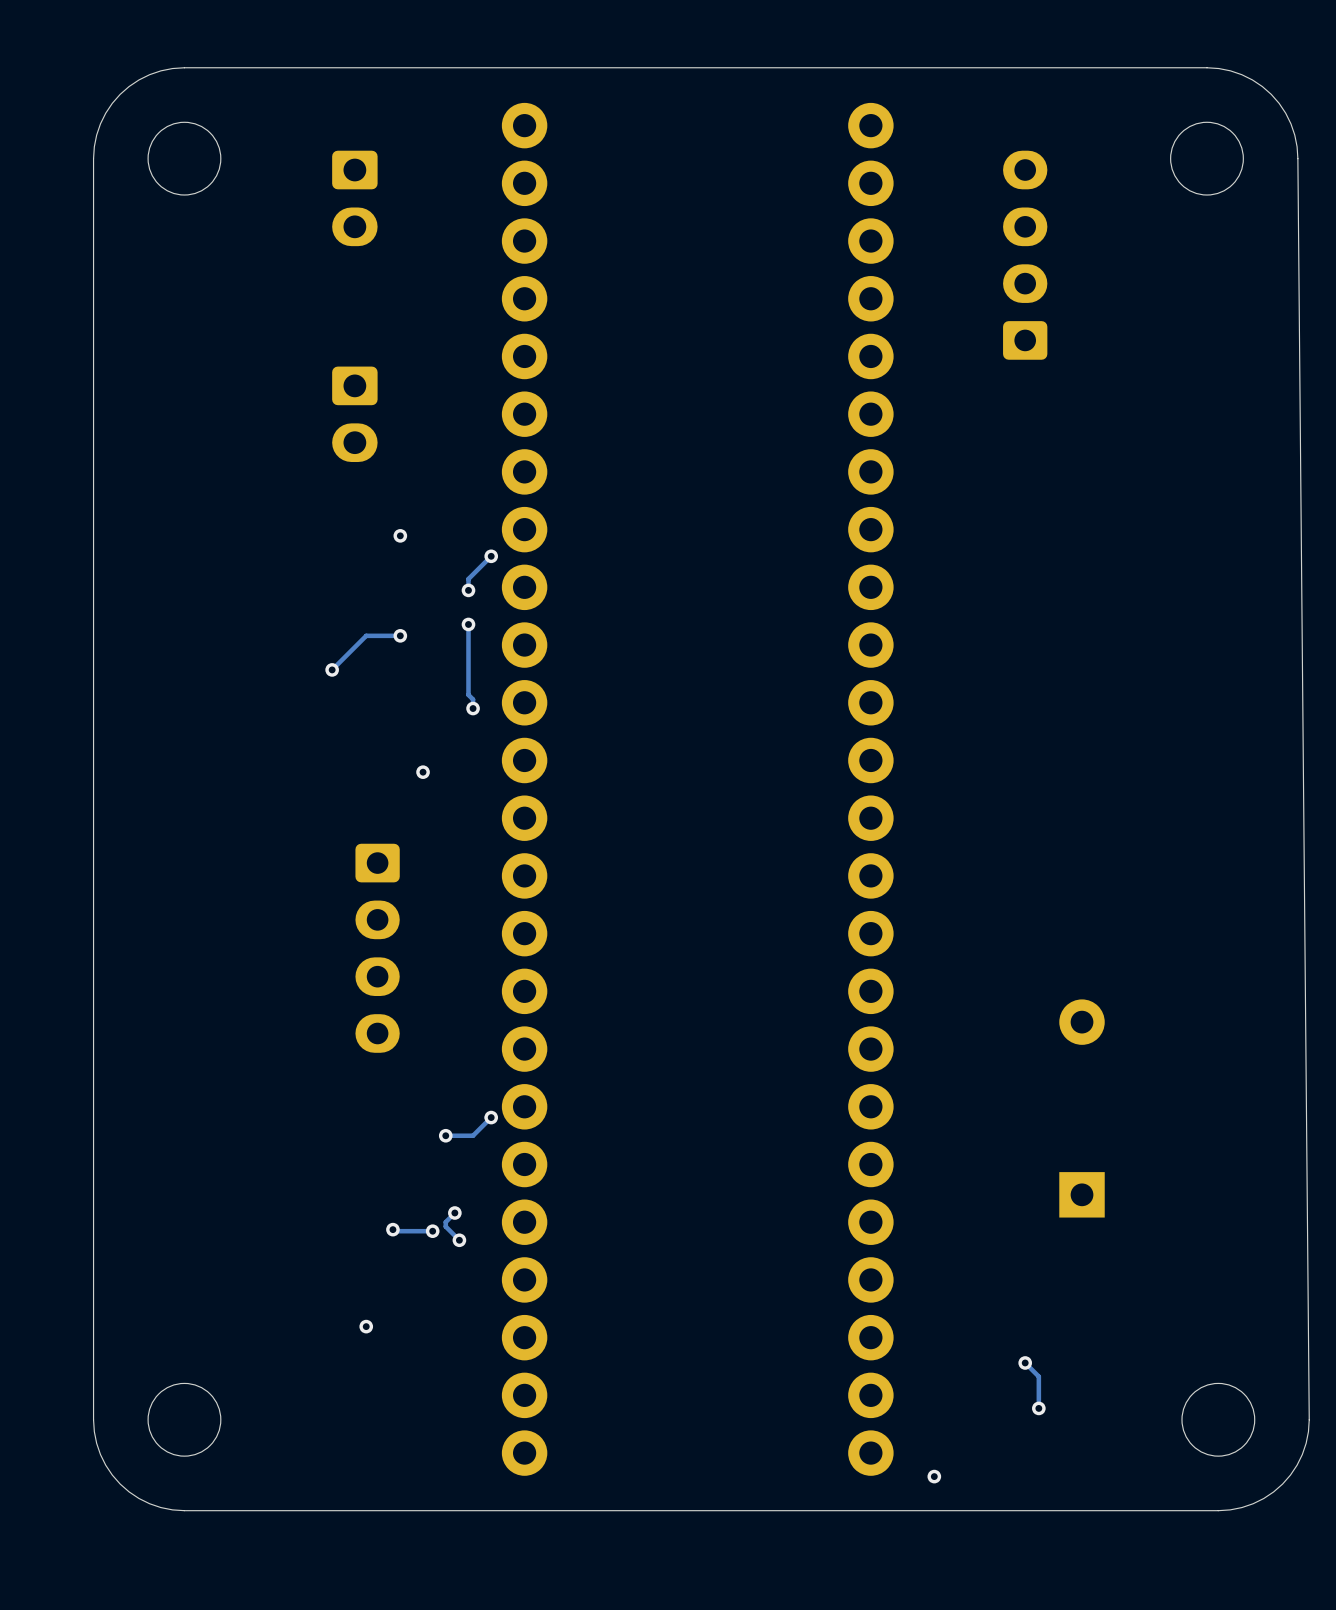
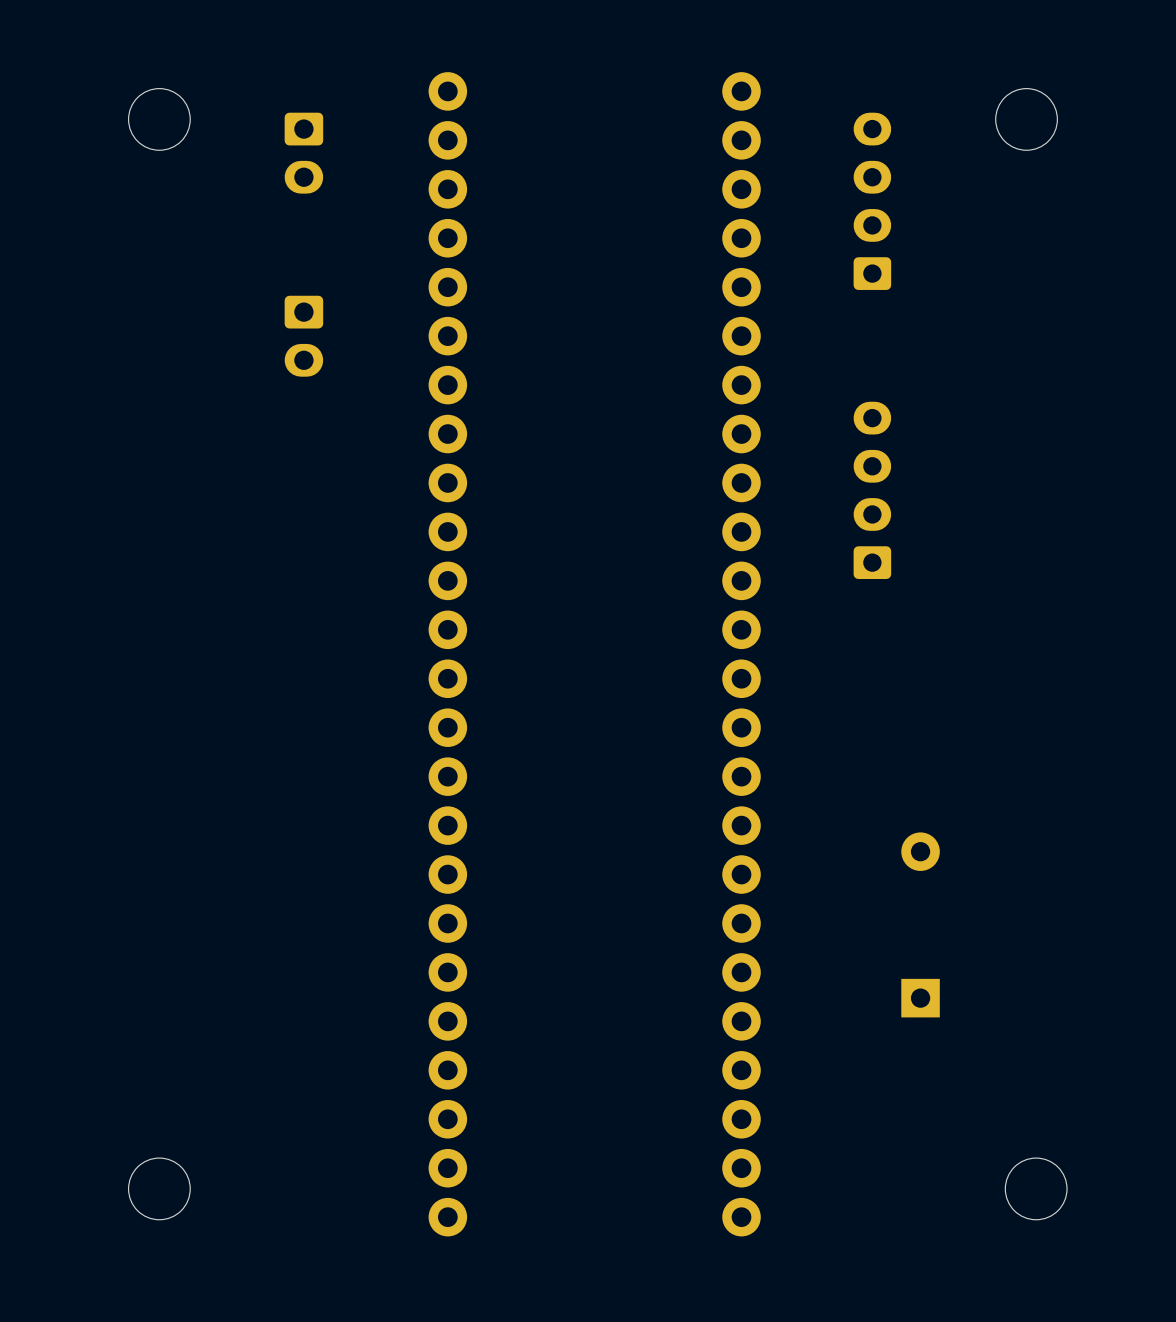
board edge: (1206, 67) (184, 67) (160, 70) (139, 79) (120, 94) (112, 103) (100, 123) (96, 135) (93, 158) (93, 1419) (96, 1443) (100, 1454) (112, 1475) (129, 1491) (149, 1503) (160, 1507) (184, 1510) (1218, 1510) (1241, 1507) (1263, 1498) (1282, 1484) (1290, 1475) (1302, 1454) (1306, 1443) (1309, 1419) (1297, 158) (1294, 135) (1290, 123) (1279, 103) (1271, 94) (1252, 79) (1241, 74) (1218, 68) (1206, 67) -> none
via: (400, 535) -> none
track: (491, 556) (468, 579) (468, 590) -> none
via: (491, 556) -> none
via: (468, 590) -> none
part: none -> (872, 490)
track: (468, 624) (468, 694) (473, 699) (473, 708) -> none
via: (468, 624) -> none
track: (400, 635) (366, 635) (332, 669) -> none
via: (400, 635) -> none
via: (332, 669) -> none
via: (473, 708) -> none
via: (423, 772) -> none
part: (377, 948) -> none
track: (486, 1117) (491, 1117) (473, 1135) (445, 1135) -> none
via: (491, 1117) -> none
via: (445, 1135) -> none
track: (454, 1213) (445, 1222) (445, 1226) (459, 1240) -> none
via: (454, 1213) -> none
track: (392, 1229) (394, 1231) (432, 1231) -> none
via: (392, 1229) -> none
via: (432, 1231) -> none
via: (459, 1240) -> none
via: (366, 1326) -> none
track: (1025, 1362) (1038, 1376) (1038, 1408) -> none
via: (1025, 1362) -> none
via: (1038, 1408) -> none
via: (934, 1476) -> none

